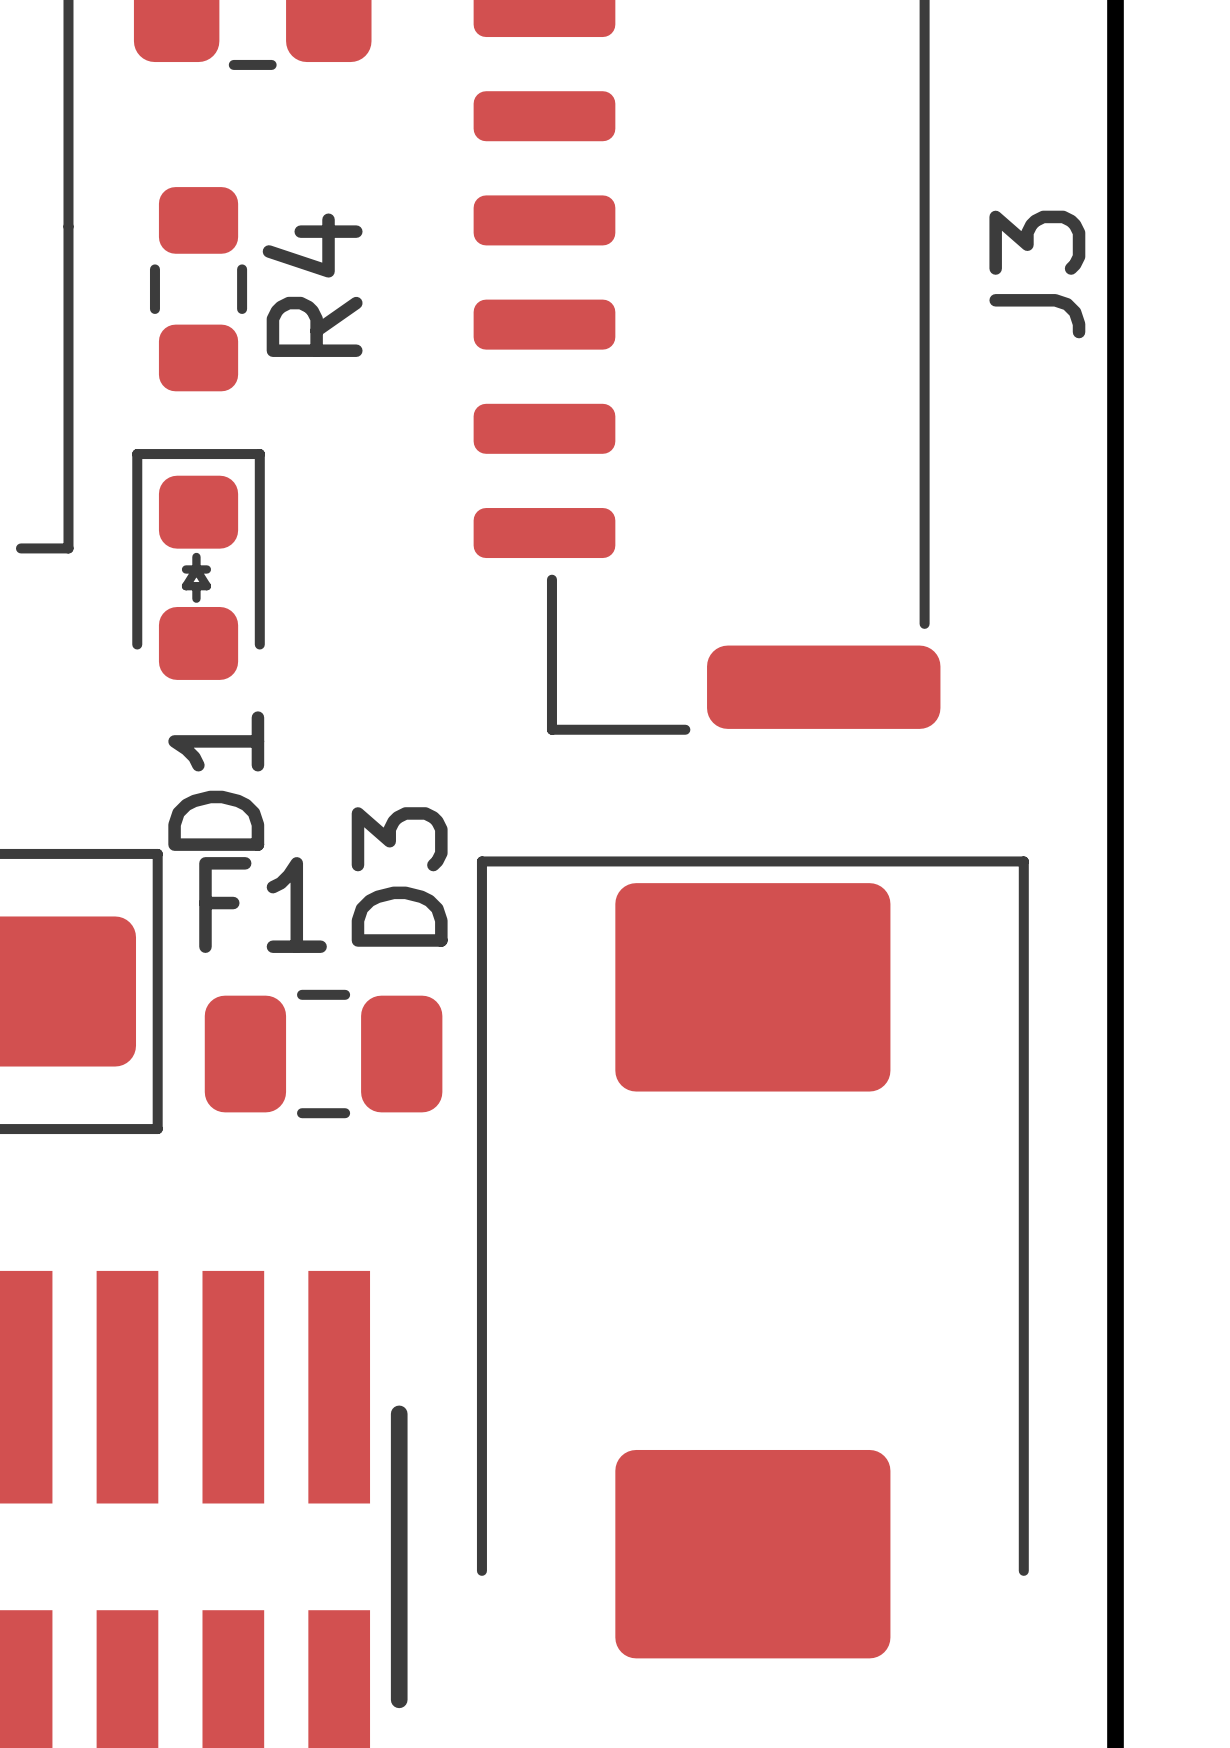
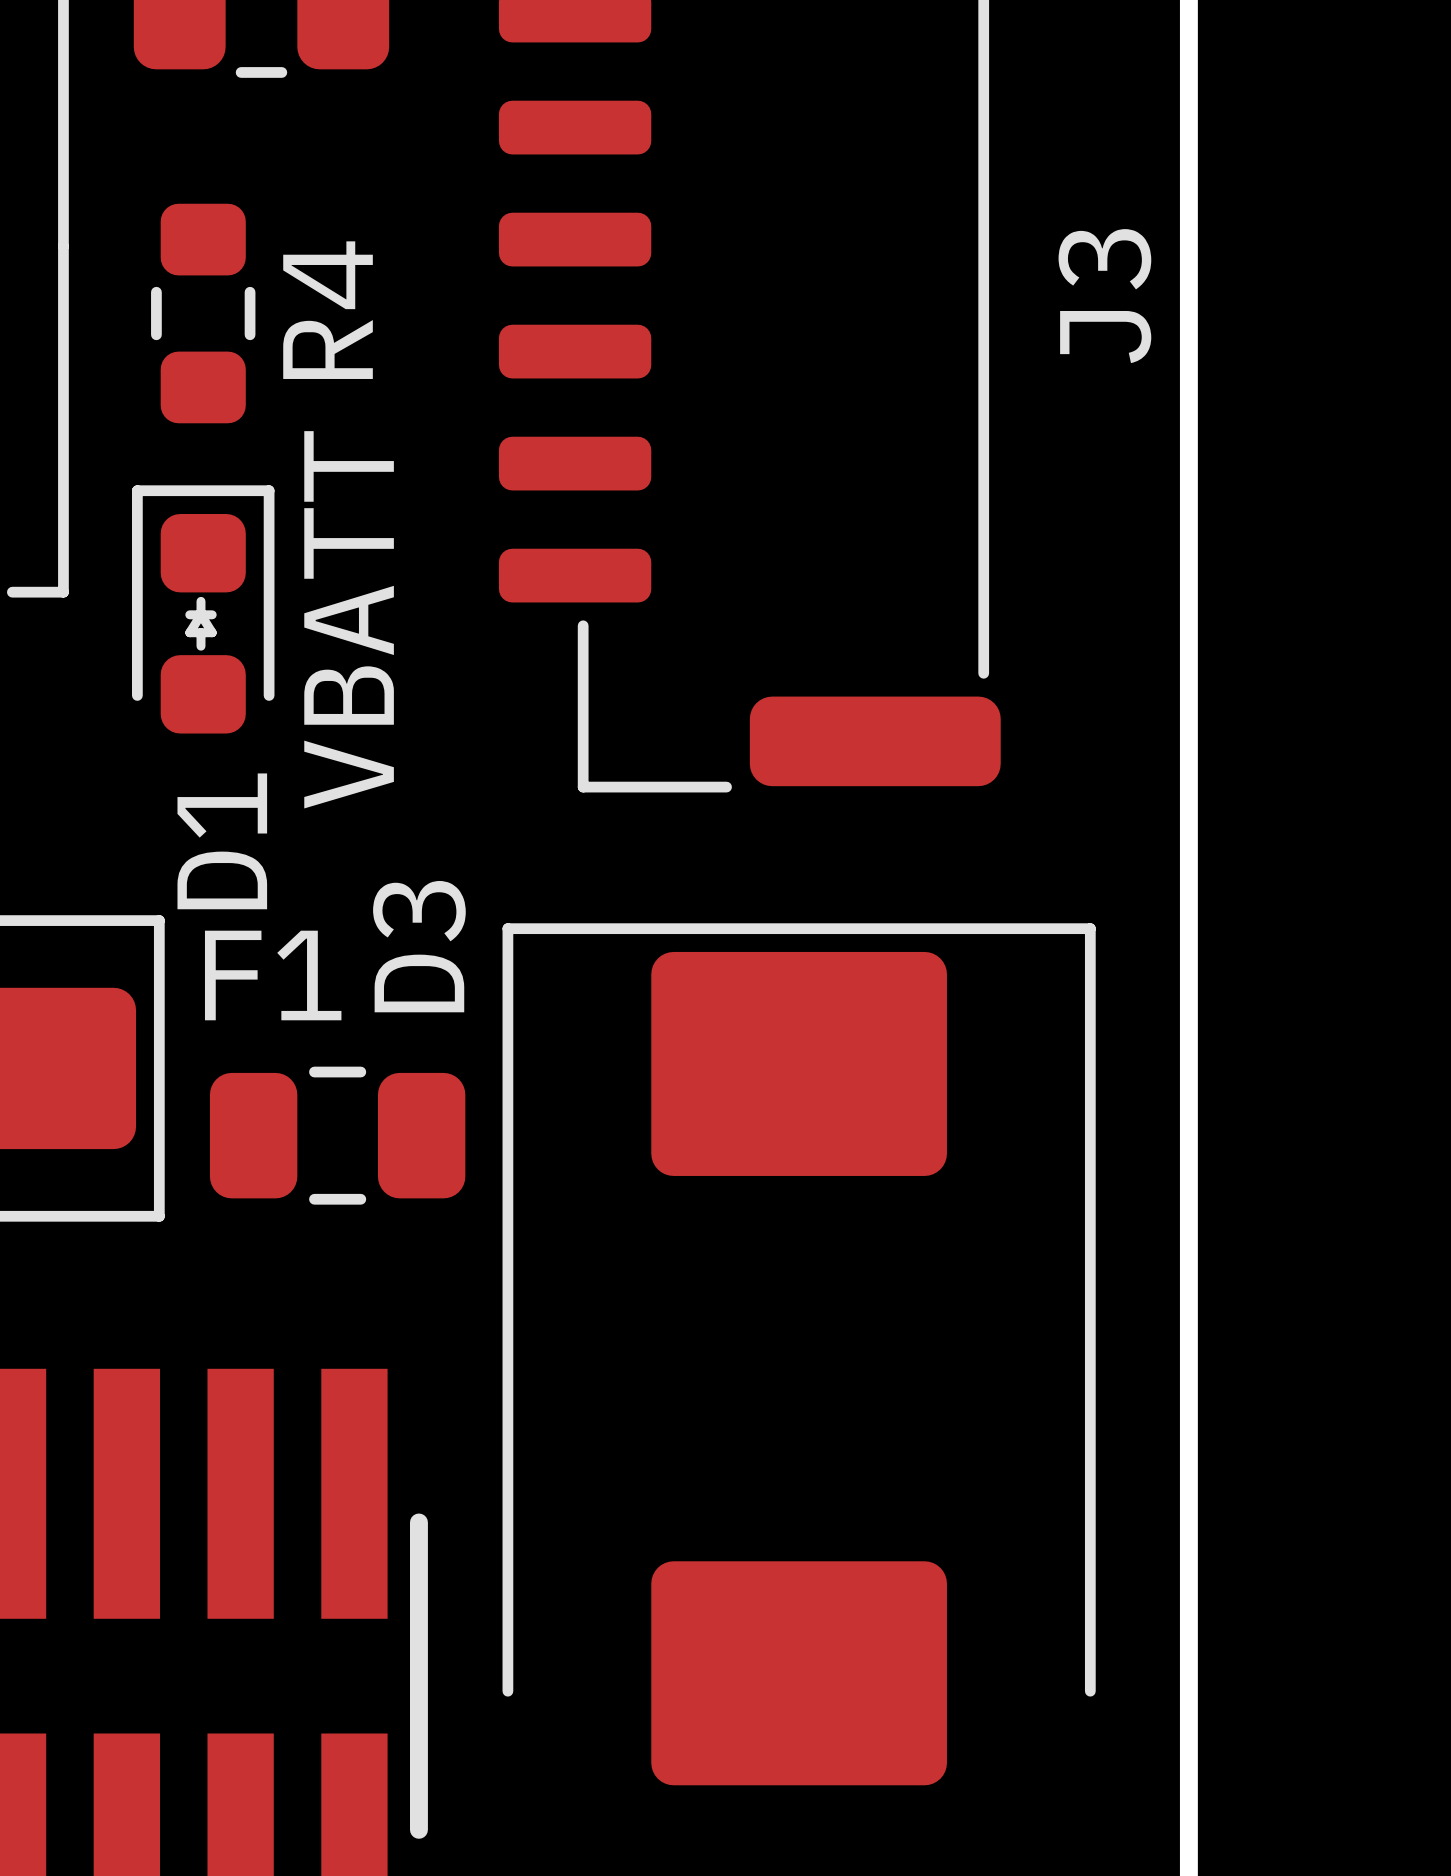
text: none -> VBATT (349, 619)

